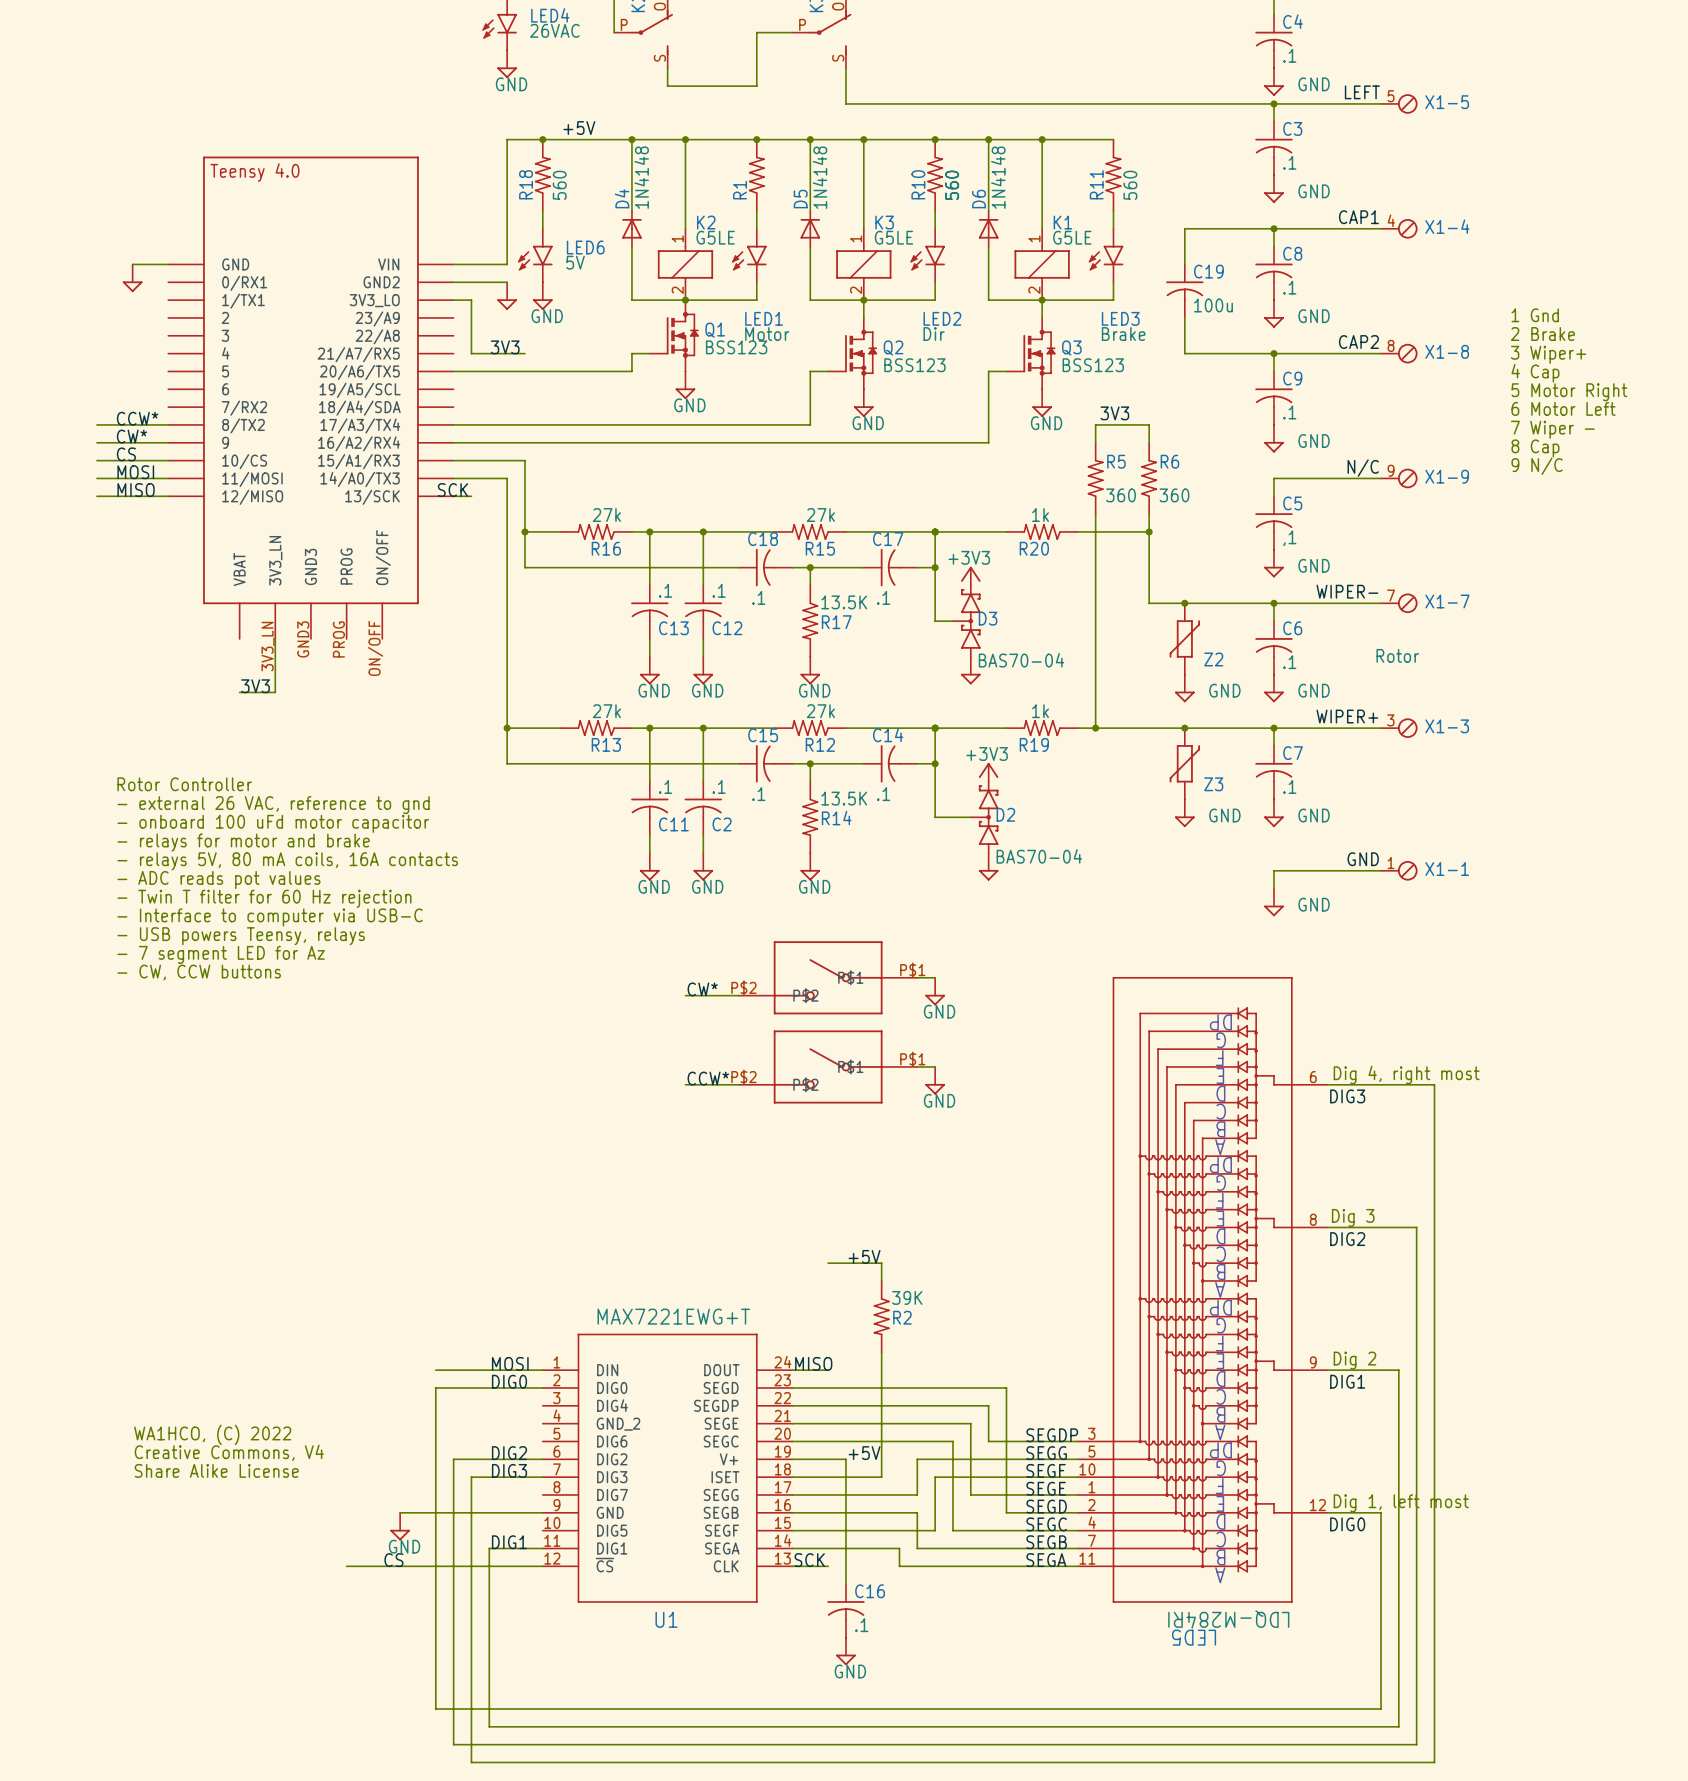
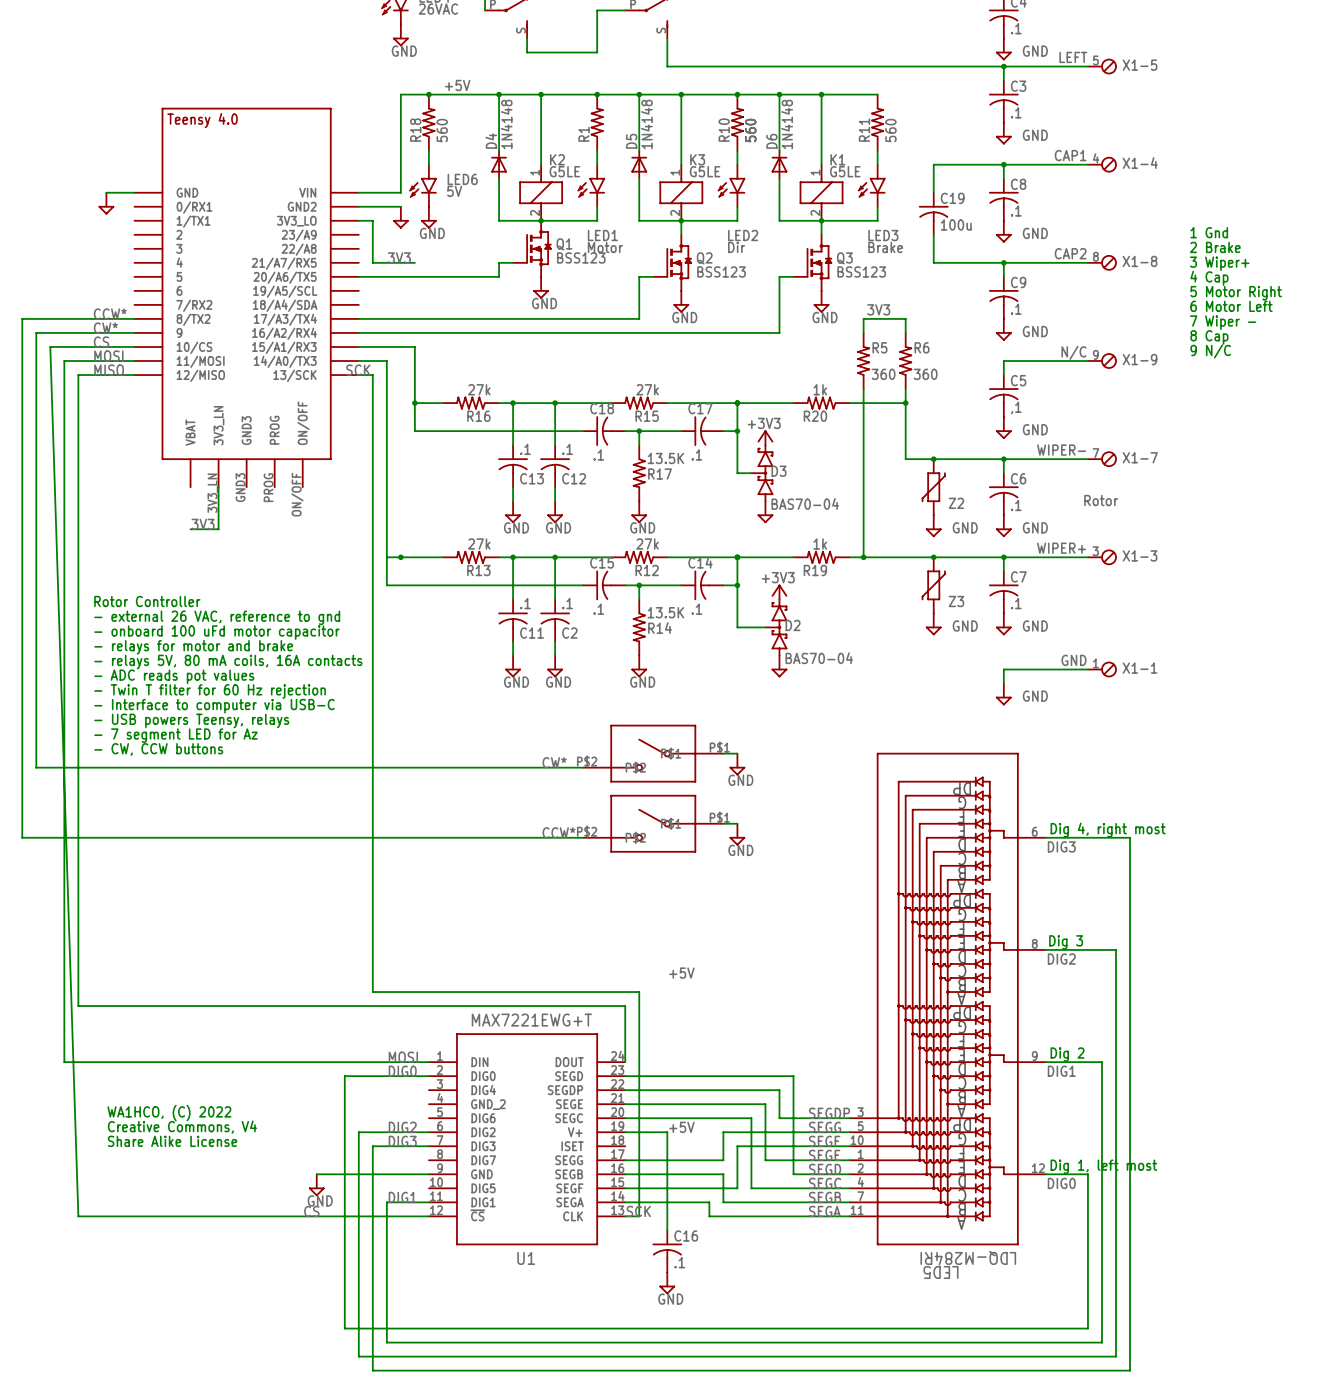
wire: none -> (78, 318) (22, 318) (22, 837) (541, 837)
wire: none -> (78, 332) (36, 332) (36, 767) (541, 767)
wire: none -> (78, 346) (50, 346) (78, 1216) (274, 1216)
wire: none -> (78, 361) (64, 361) (64, 1062) (344, 1062)
wire: (489, 478) (507, 478) (507, 763) -> (386, 361) (386, 585) (400, 585)
wire: none -> (386, 557) (400, 557)
wire: (828, 1263) (881, 1263) (881, 1280) -> none
R2: 39K (881, 1316) -> none
wire: (881, 1352) (881, 1477) (792, 1477) -> none
label: MISO (813, 1363) -> none
wire: (792, 1370) (828, 1370) -> (625, 1062) (625, 1006) (78, 1006) (78, 375)
wire: (810, 1566) (828, 1566) -> (639, 1216) (639, 992) (372, 992) (372, 375)

